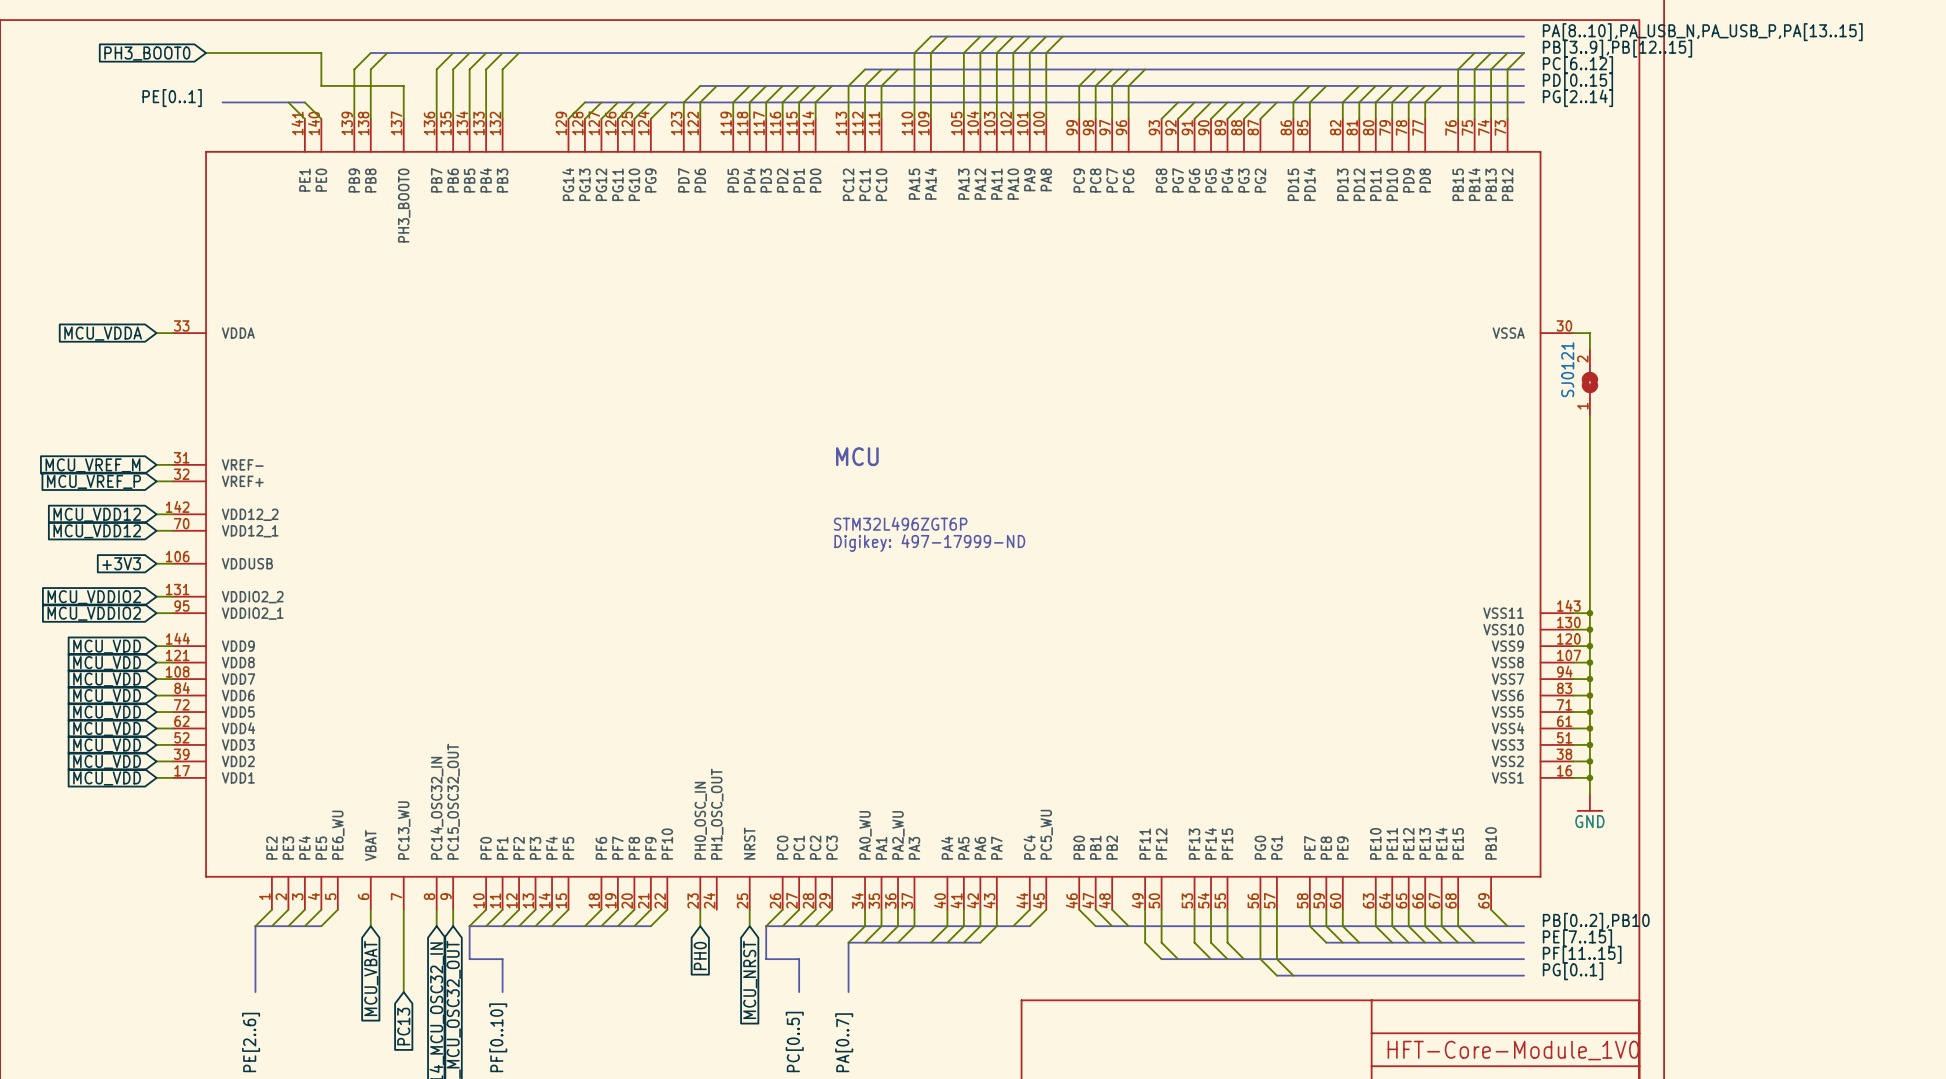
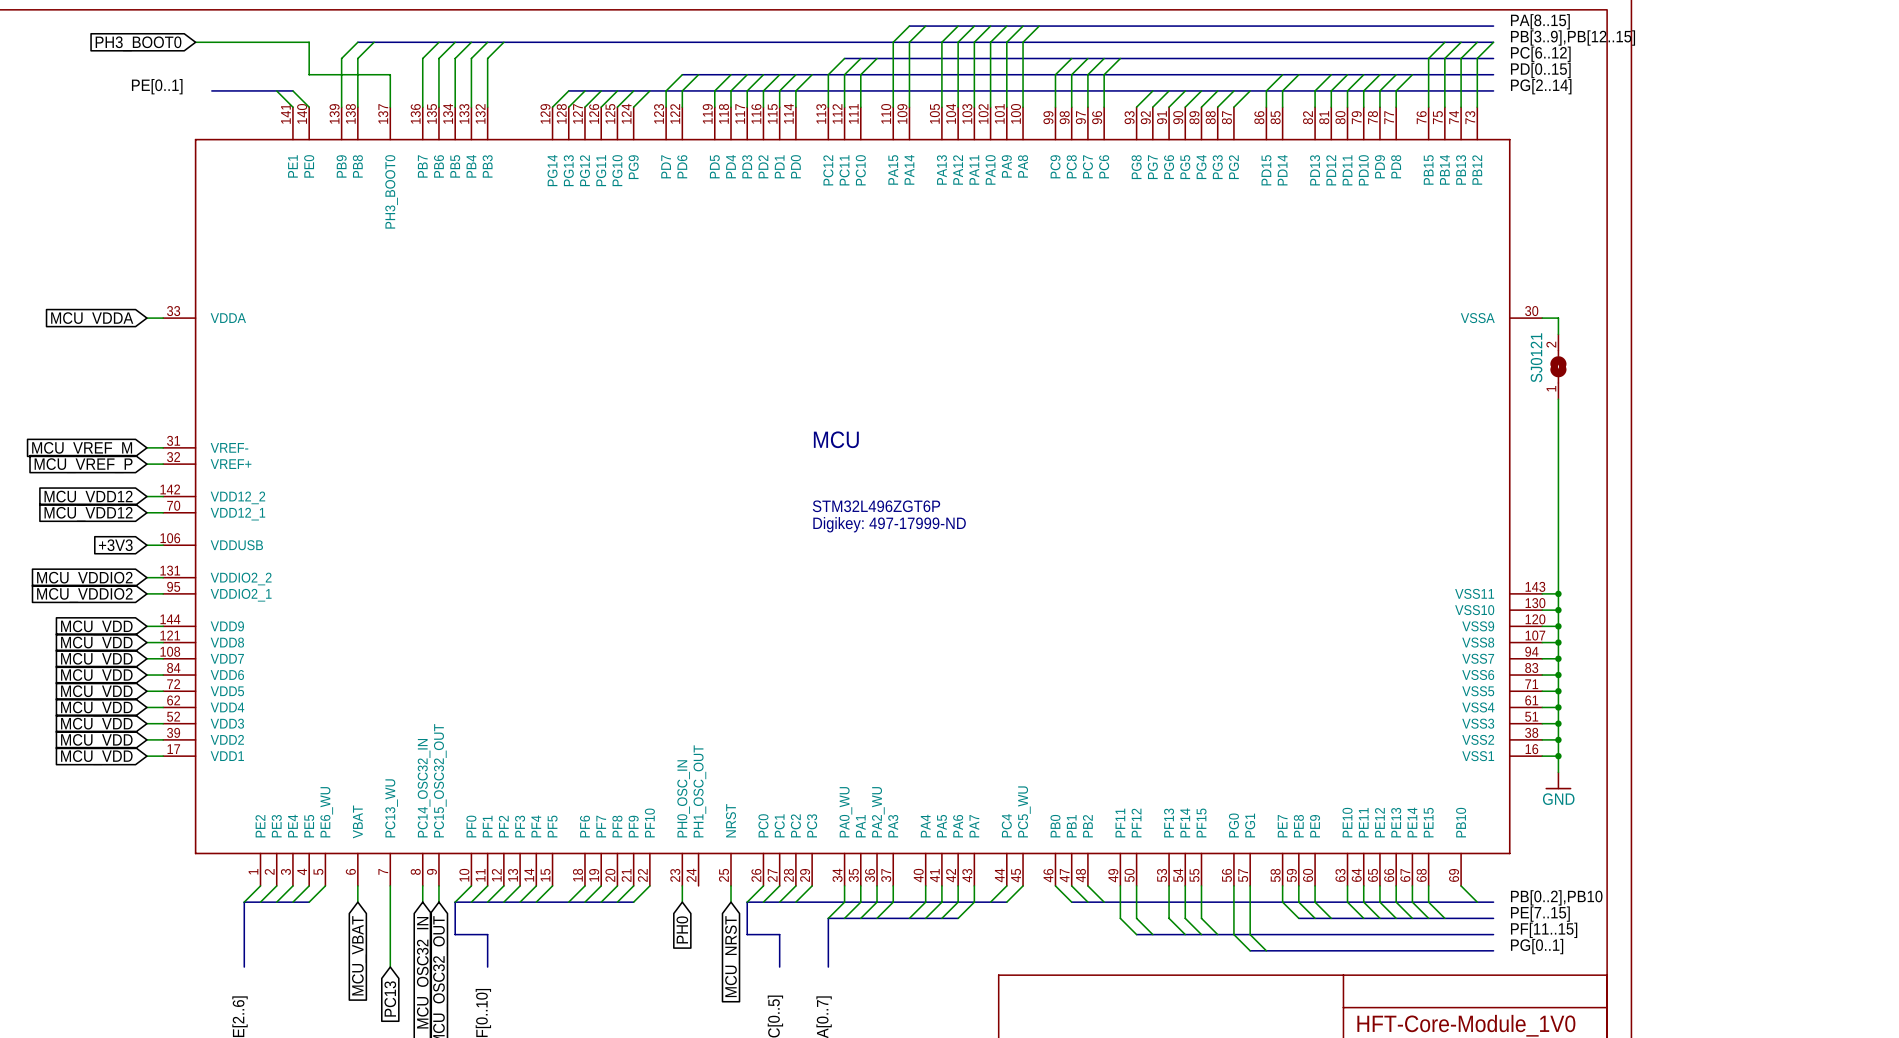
label: PA[8..10],PA_USB_N,PA_USB_P,PA[13..15] (1702, 32) -> PA[8..15] (1540, 21)

